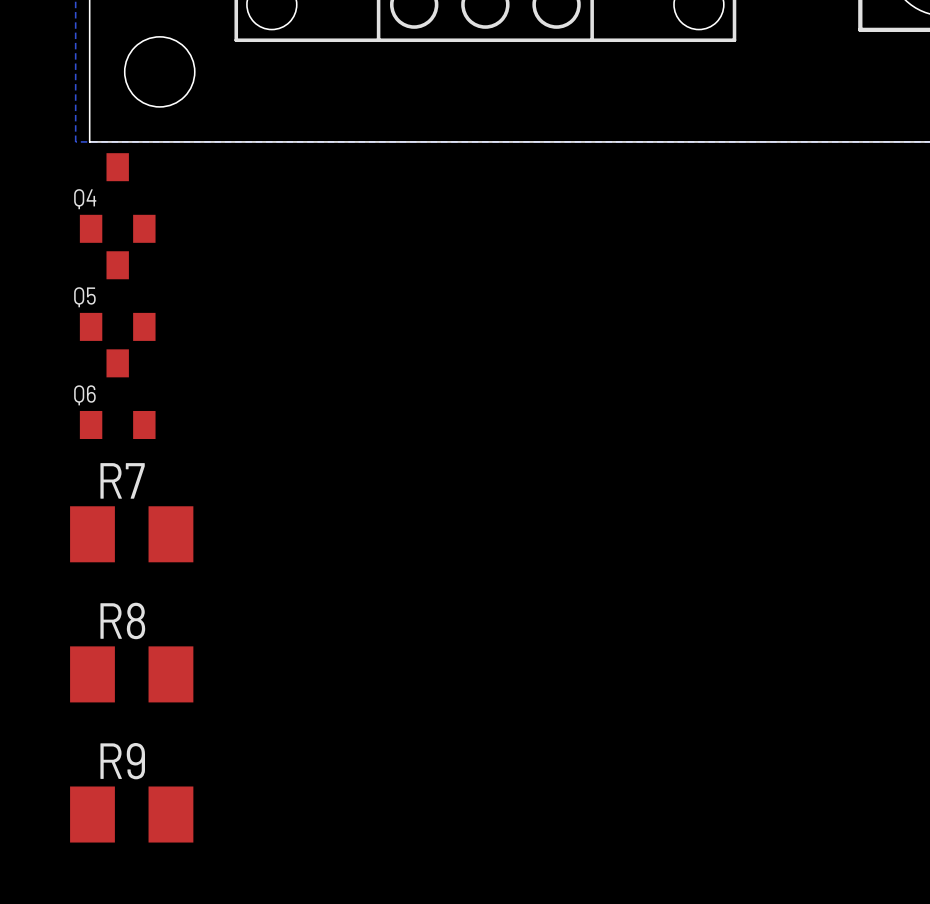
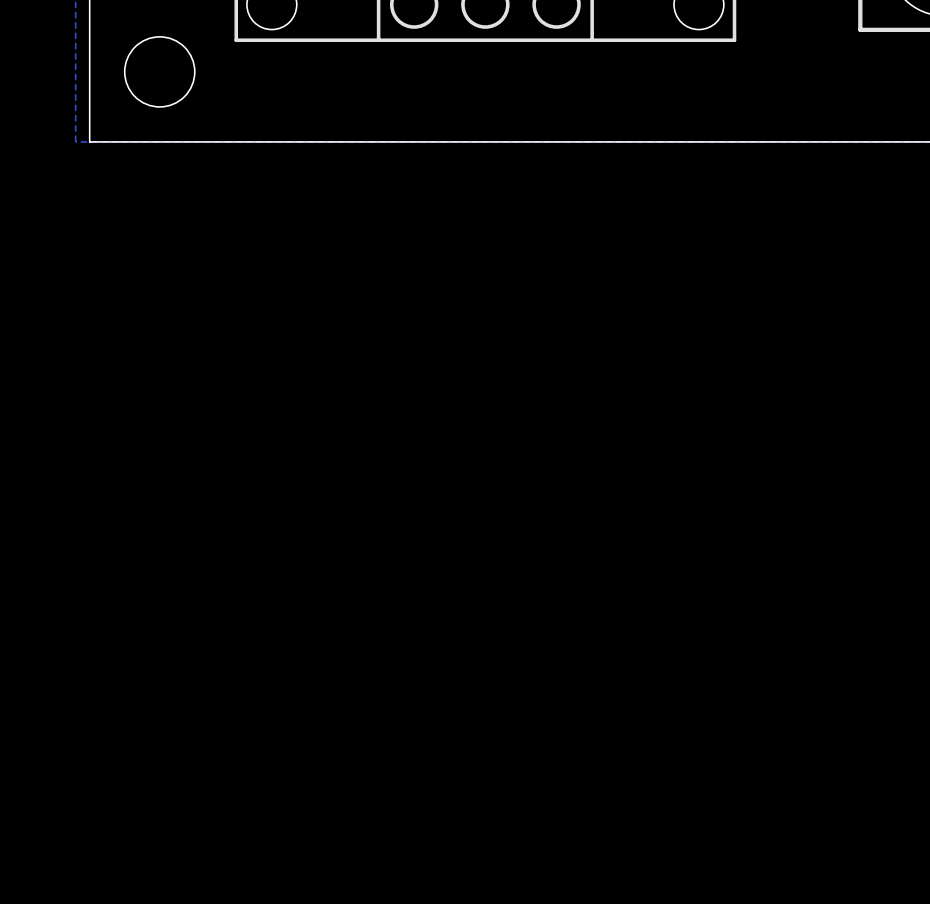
Q4: (117, 198) -> none
Q5: (117, 296) -> none
Q6: (117, 394) -> none
R7: (131, 534) -> none
R8: (131, 674) -> none
R9: (131, 814) -> none

